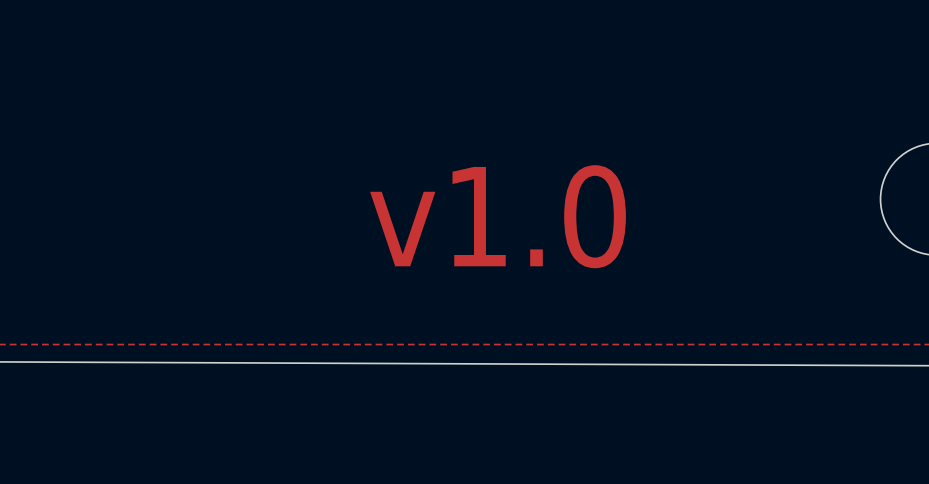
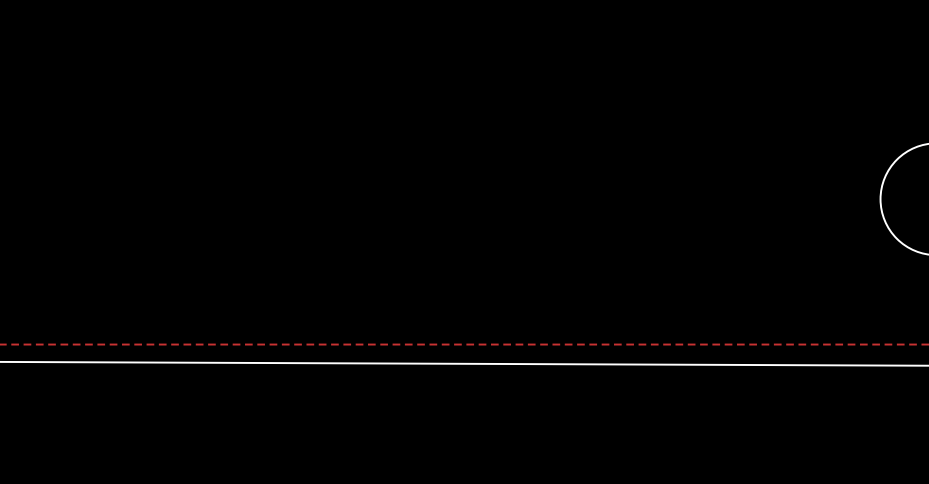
text: v1.0 (498, 216) -> none

